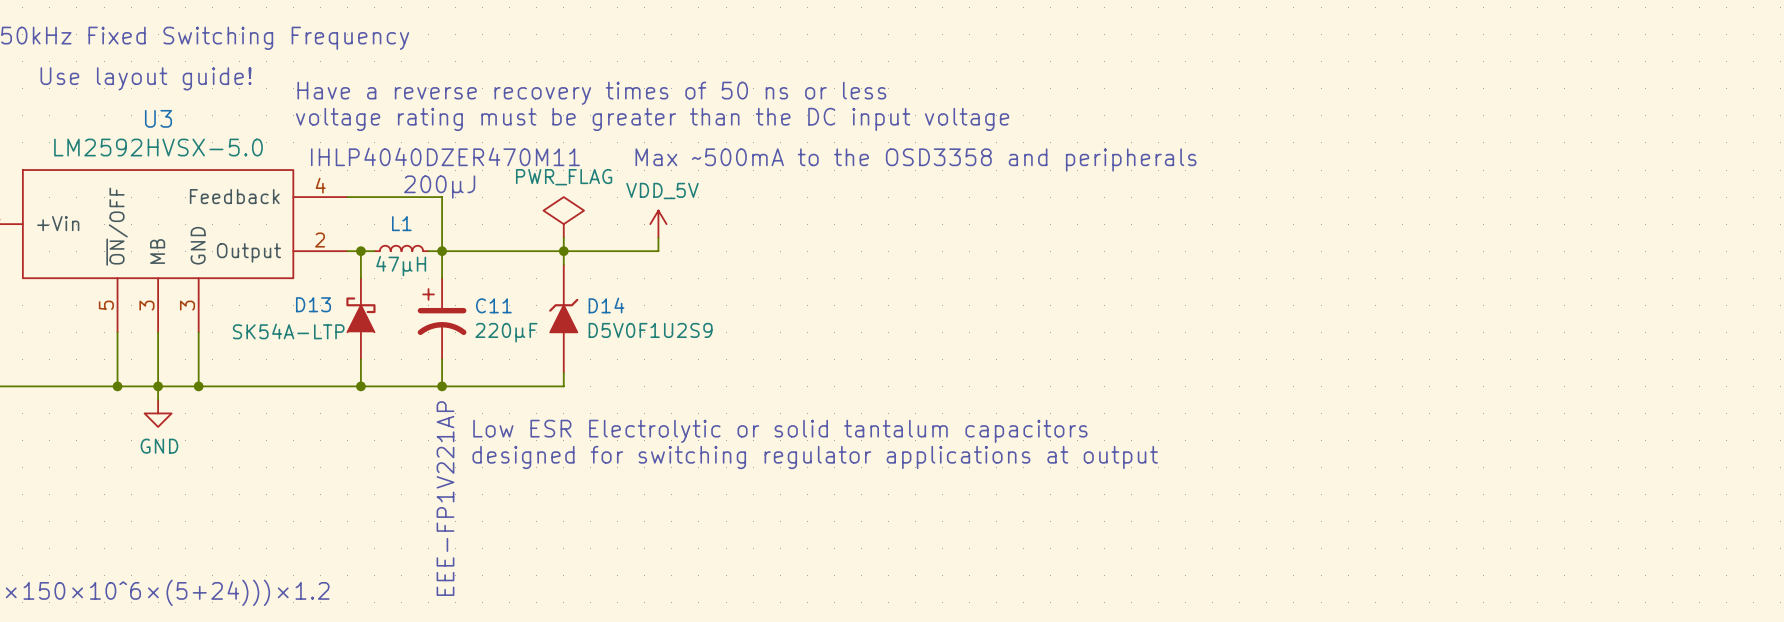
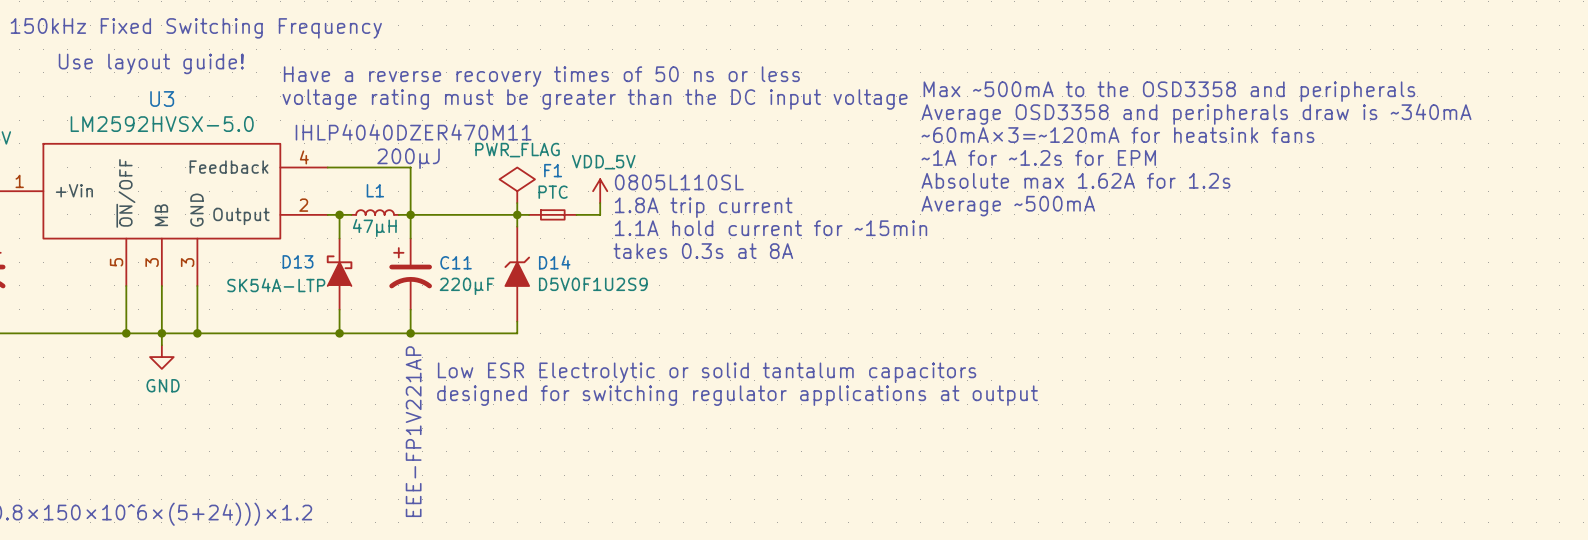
text: none -> Max ~500mA to the OSD3358 and peripherals (1169, 91)
text: none -> Average OSD3358 and peripherals draw is ~340mA (1196, 114)
text: Max ~500mA to the OSD3358 and peripherals (916, 159) -> none
text: none -> ~60mA×3=~120mA for heatsink fans (1117, 135)
text: none -> ~1A for ~1.2s for EPM (1038, 157)
text: none -> Absolute max 1.62A for 1.2s (1076, 180)
text: none -> 0805L110SL (679, 182)
text: none -> Average ~500mA (1008, 206)
text: none -> 1.8A trip current (703, 207)
F1: none -> PTC (552, 214)
text: none -> 1.1A hold current for ~15min (771, 228)
text: none -> takes 0.3s at 8A (703, 251)

